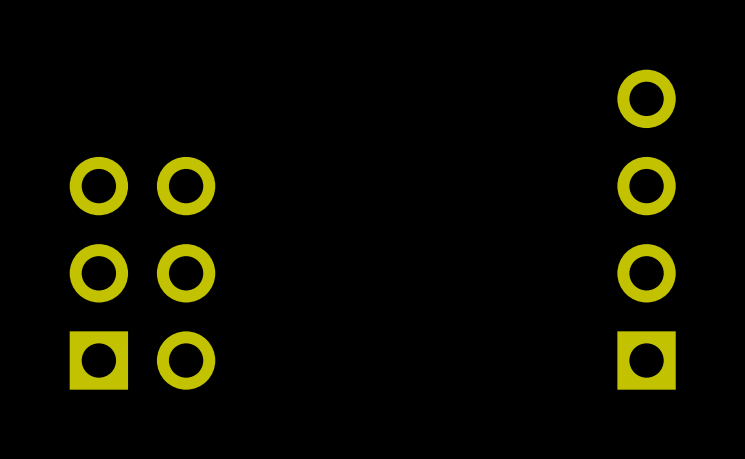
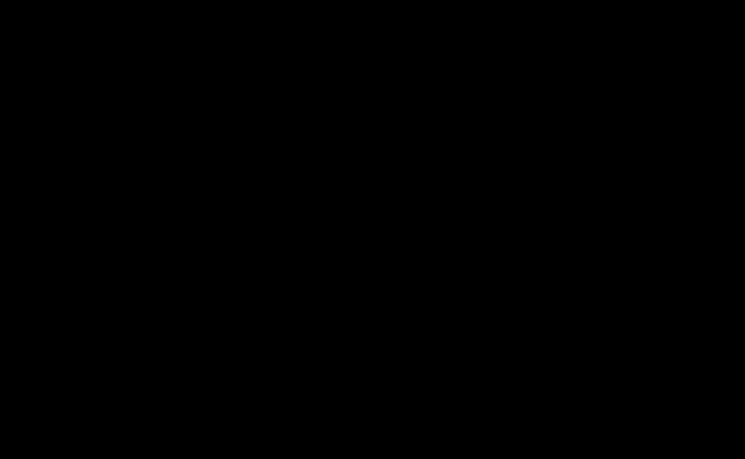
part: (646, 229) -> none
part: (142, 273) -> none

